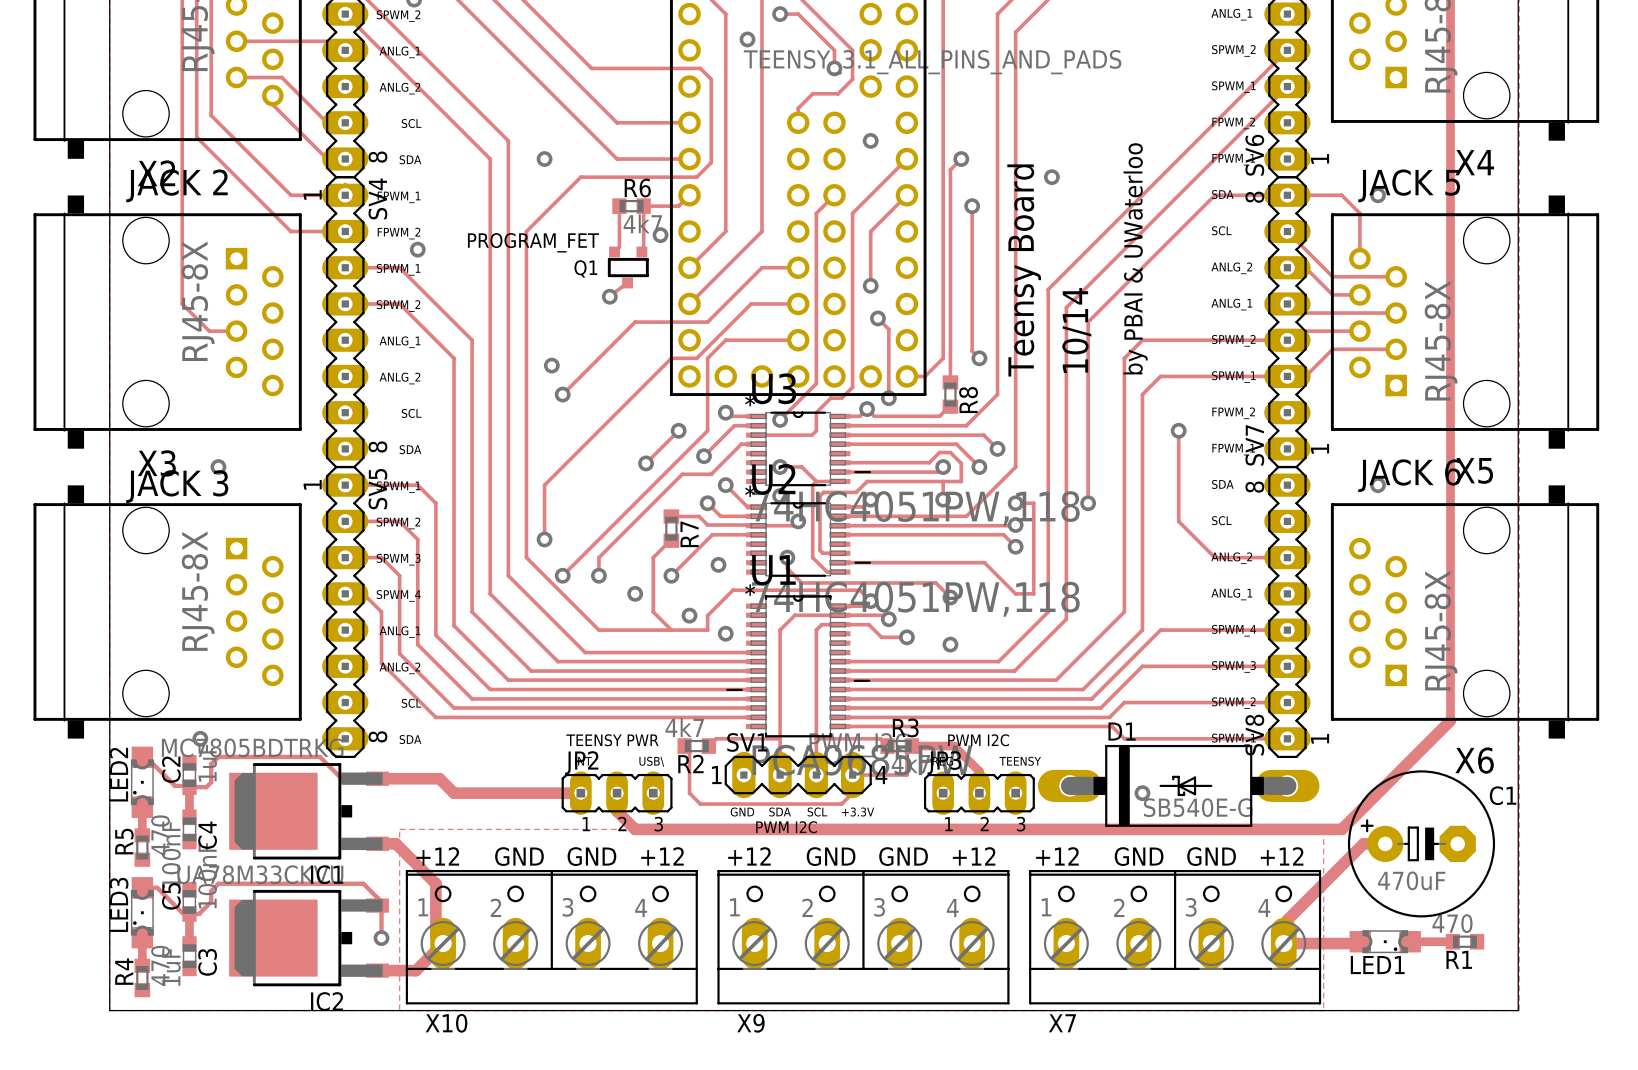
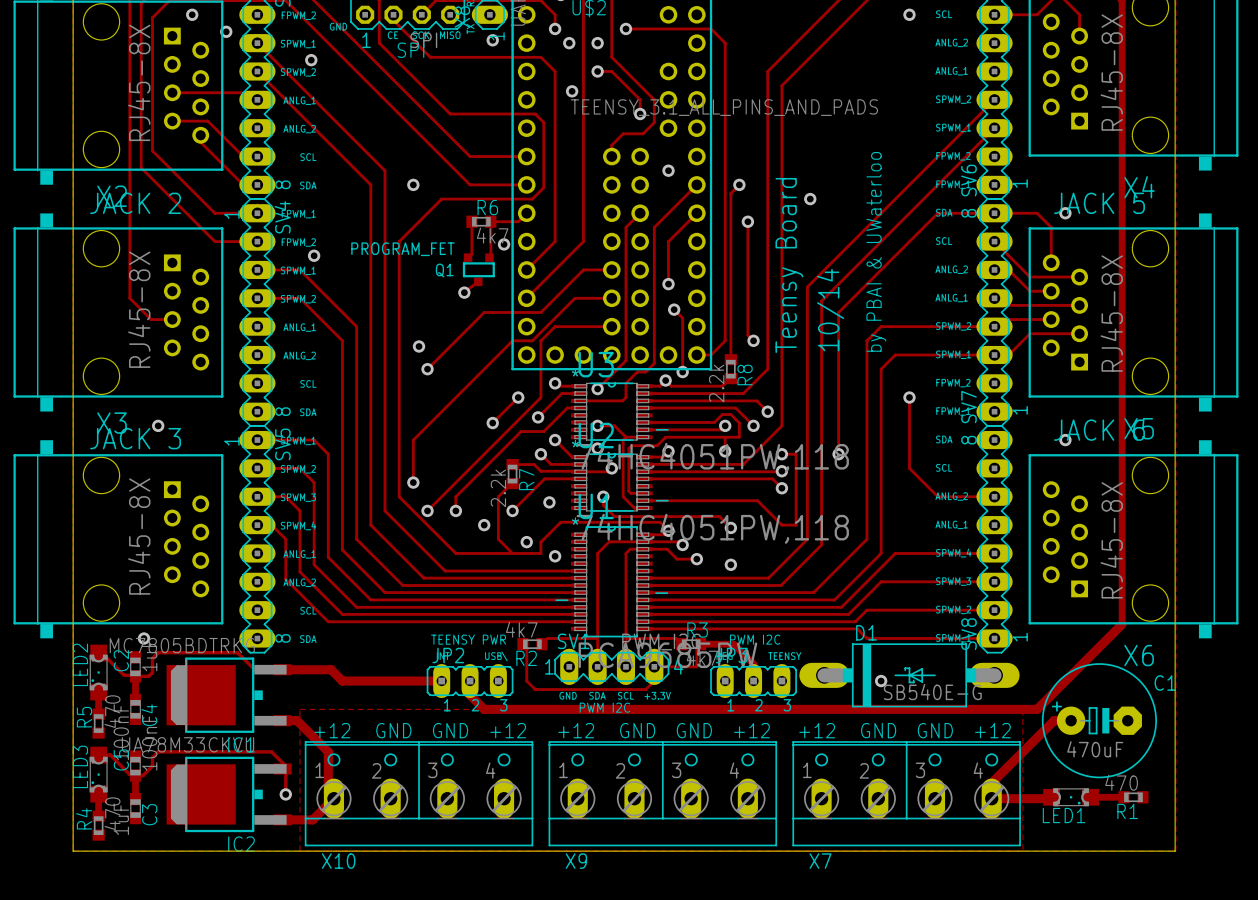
R8 value: none -> 2.2k (716, 383)
R7 value: none -> 2.2k (498, 488)

